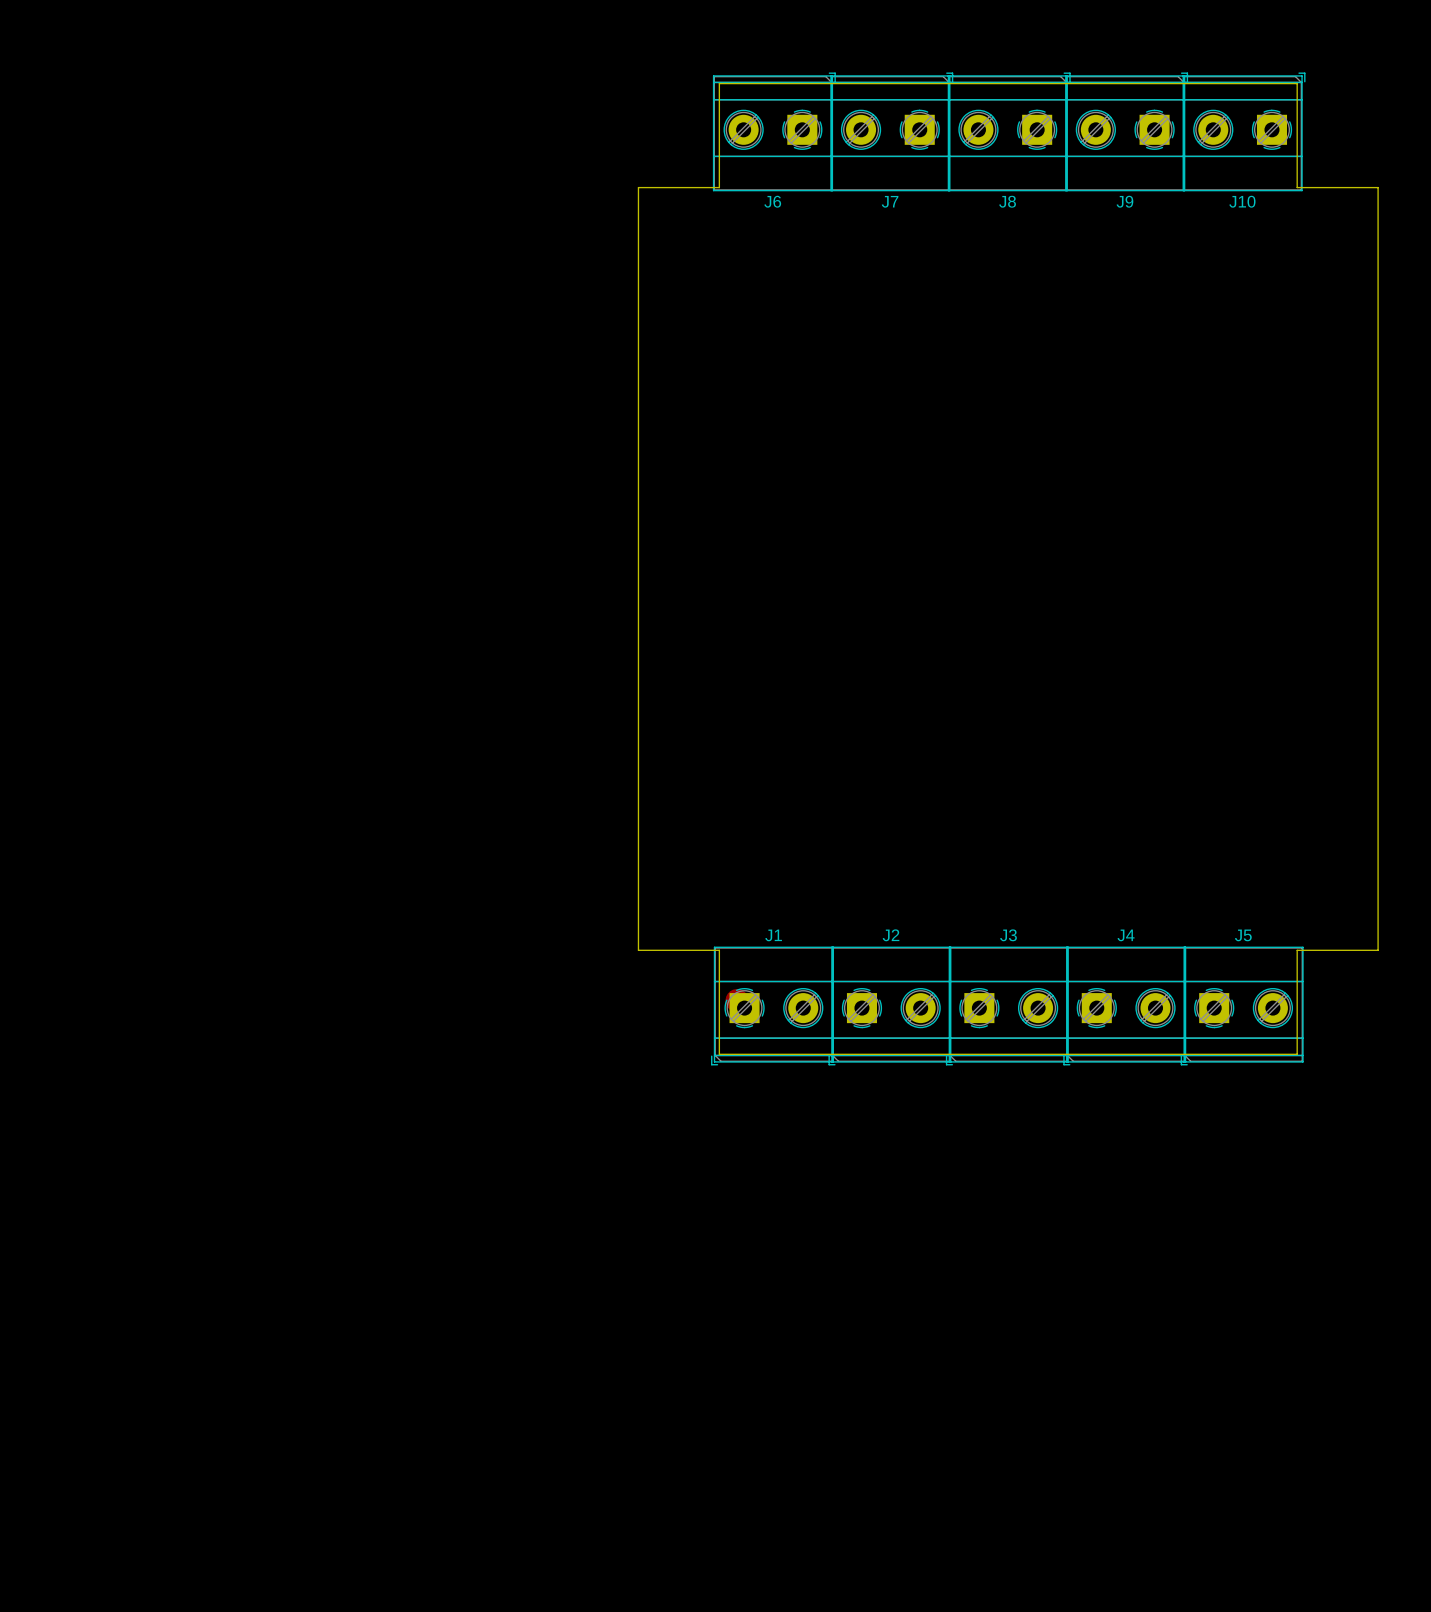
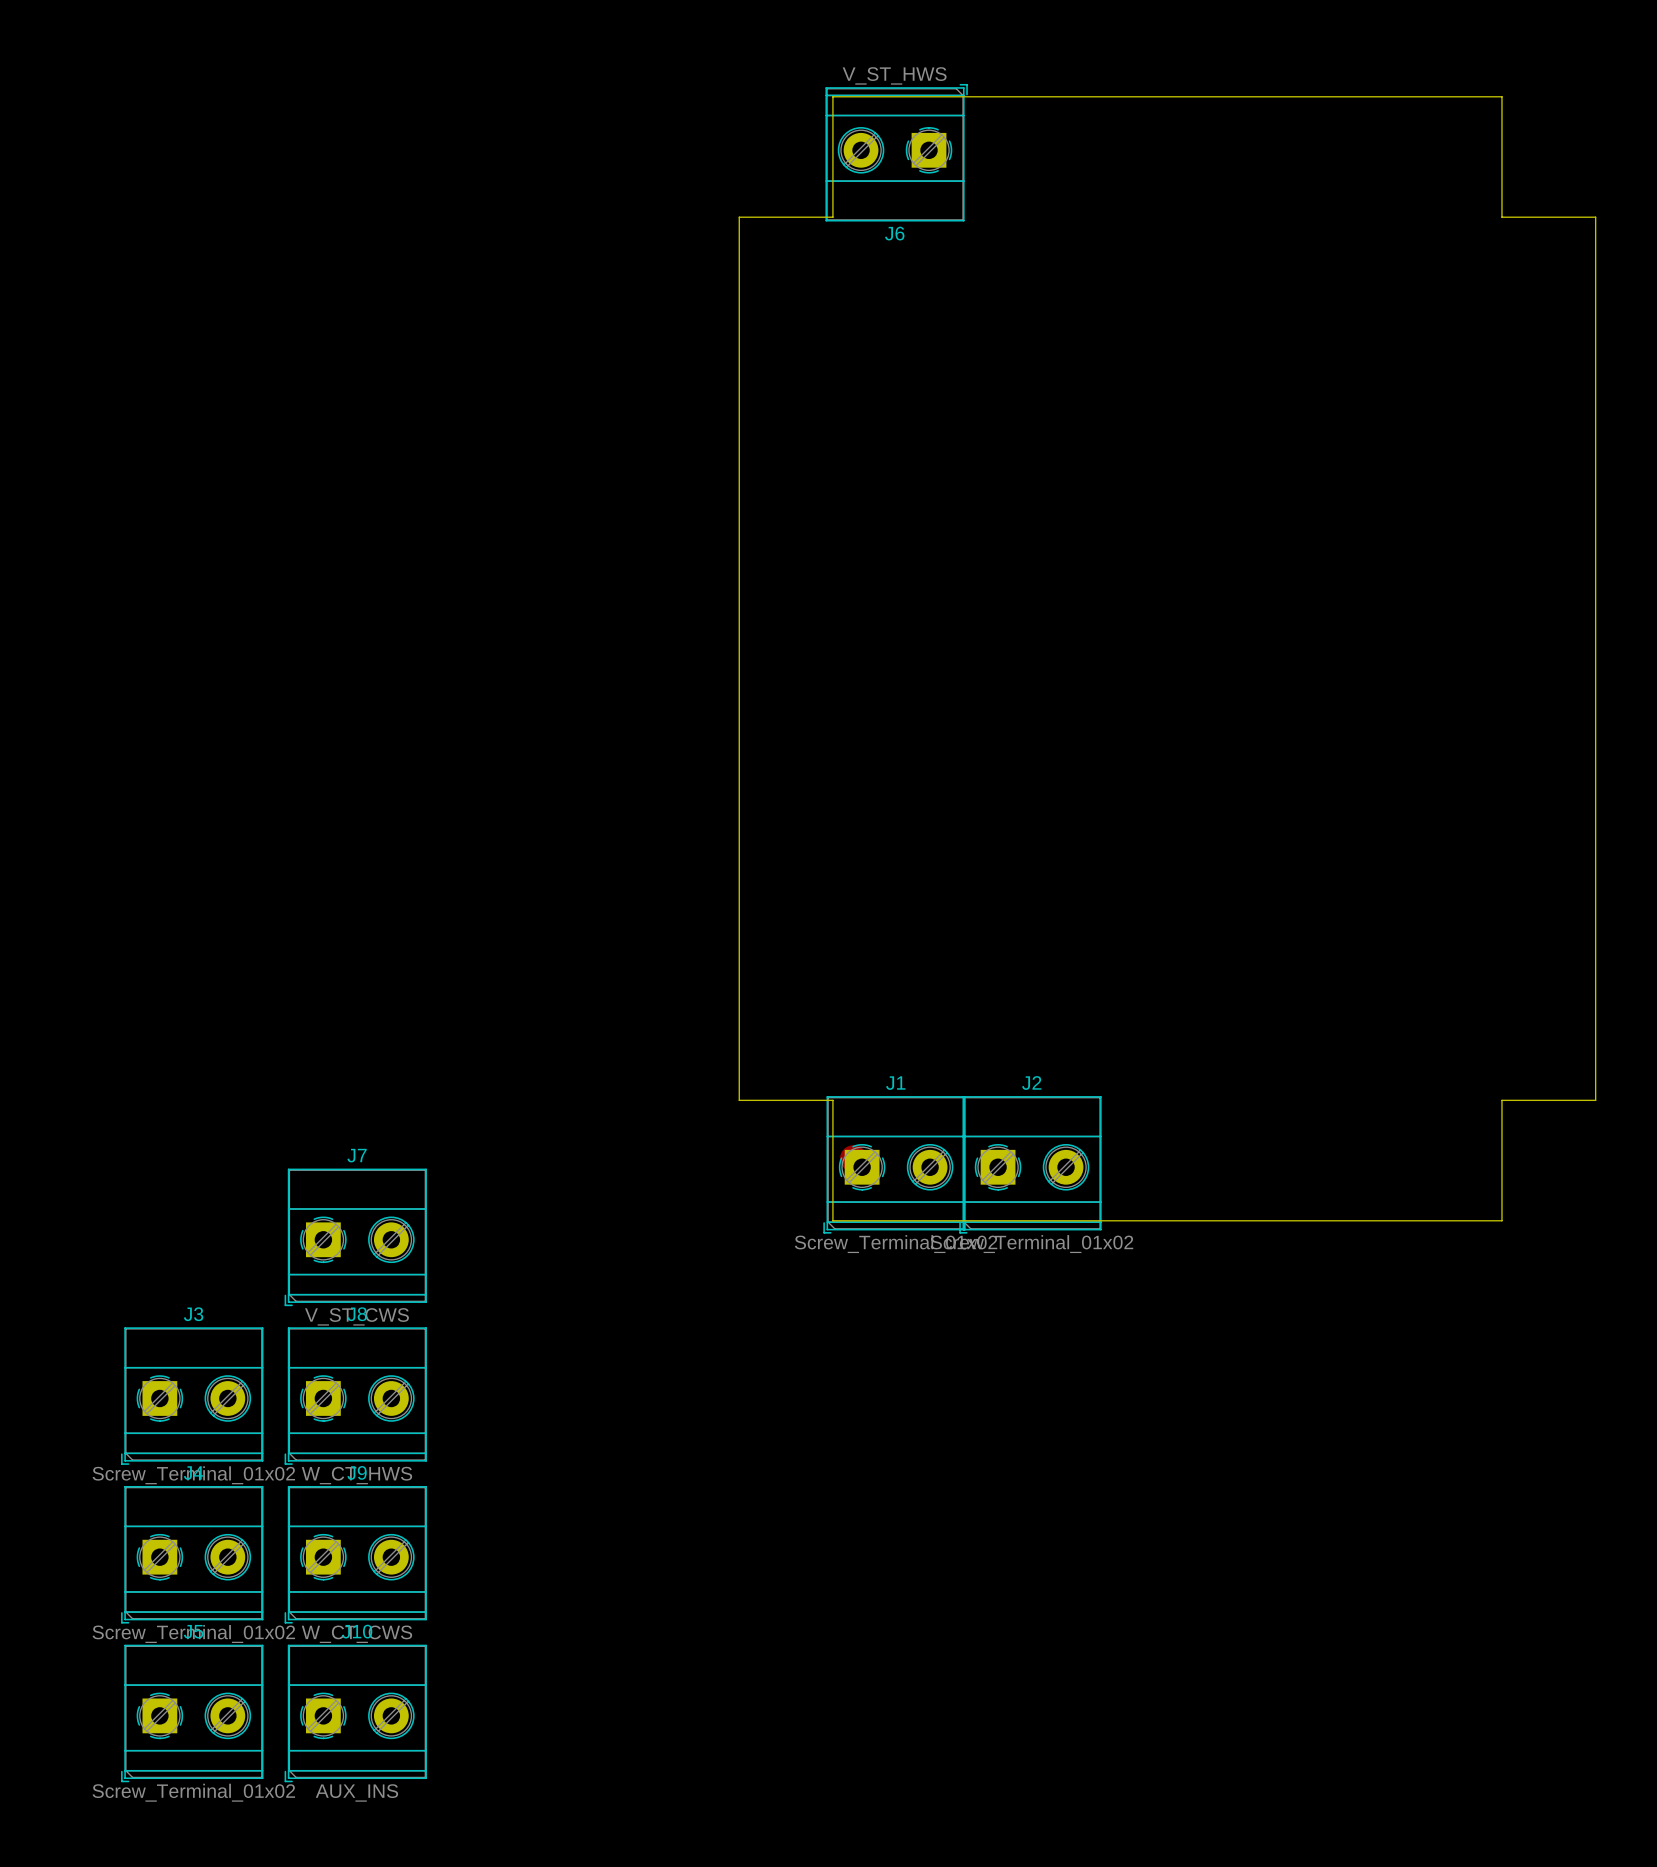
J6 value: none -> V_ST_HWS (894, 75)
J7 rotation: 0° (891, 131) -> 180° (355, 1237)
J7 position: (891, 131) -> (355, 1237)
J8 rotation: 0° (1009, 131) -> 180° (355, 1396)
J8 position: (1009, 131) -> (355, 1396)
J9 rotation: 0° (1126, 131) -> 180° (355, 1554)
J9 position: (1126, 131) -> (355, 1554)
J10 rotation: 0° (1244, 131) -> 180° (355, 1713)
J10 position: (1244, 131) -> (355, 1713)
J3 position: (1007, 1006) -> (192, 1396)
J4 position: (1124, 1006) -> (192, 1554)
J5 position: (1242, 1006) -> (192, 1713)
J1 value: none -> Screw_Terminal_01x02 (896, 1244)
J2 value: none -> Screw_Terminal_01x02 (1032, 1244)
J7 value: none -> V_ST_CWS (356, 1316)
J3 value: none -> Screw_Terminal_01x02 (193, 1475)
J8 value: none -> W_CT_HWS (356, 1475)
J4 value: none -> Screw_Terminal_01x02 (193, 1634)
J9 value: none -> W_CT_CWS (356, 1634)
J5 value: none -> Screw_Terminal_01x02 (193, 1792)
J10 value: none -> AUX_INS (356, 1792)

